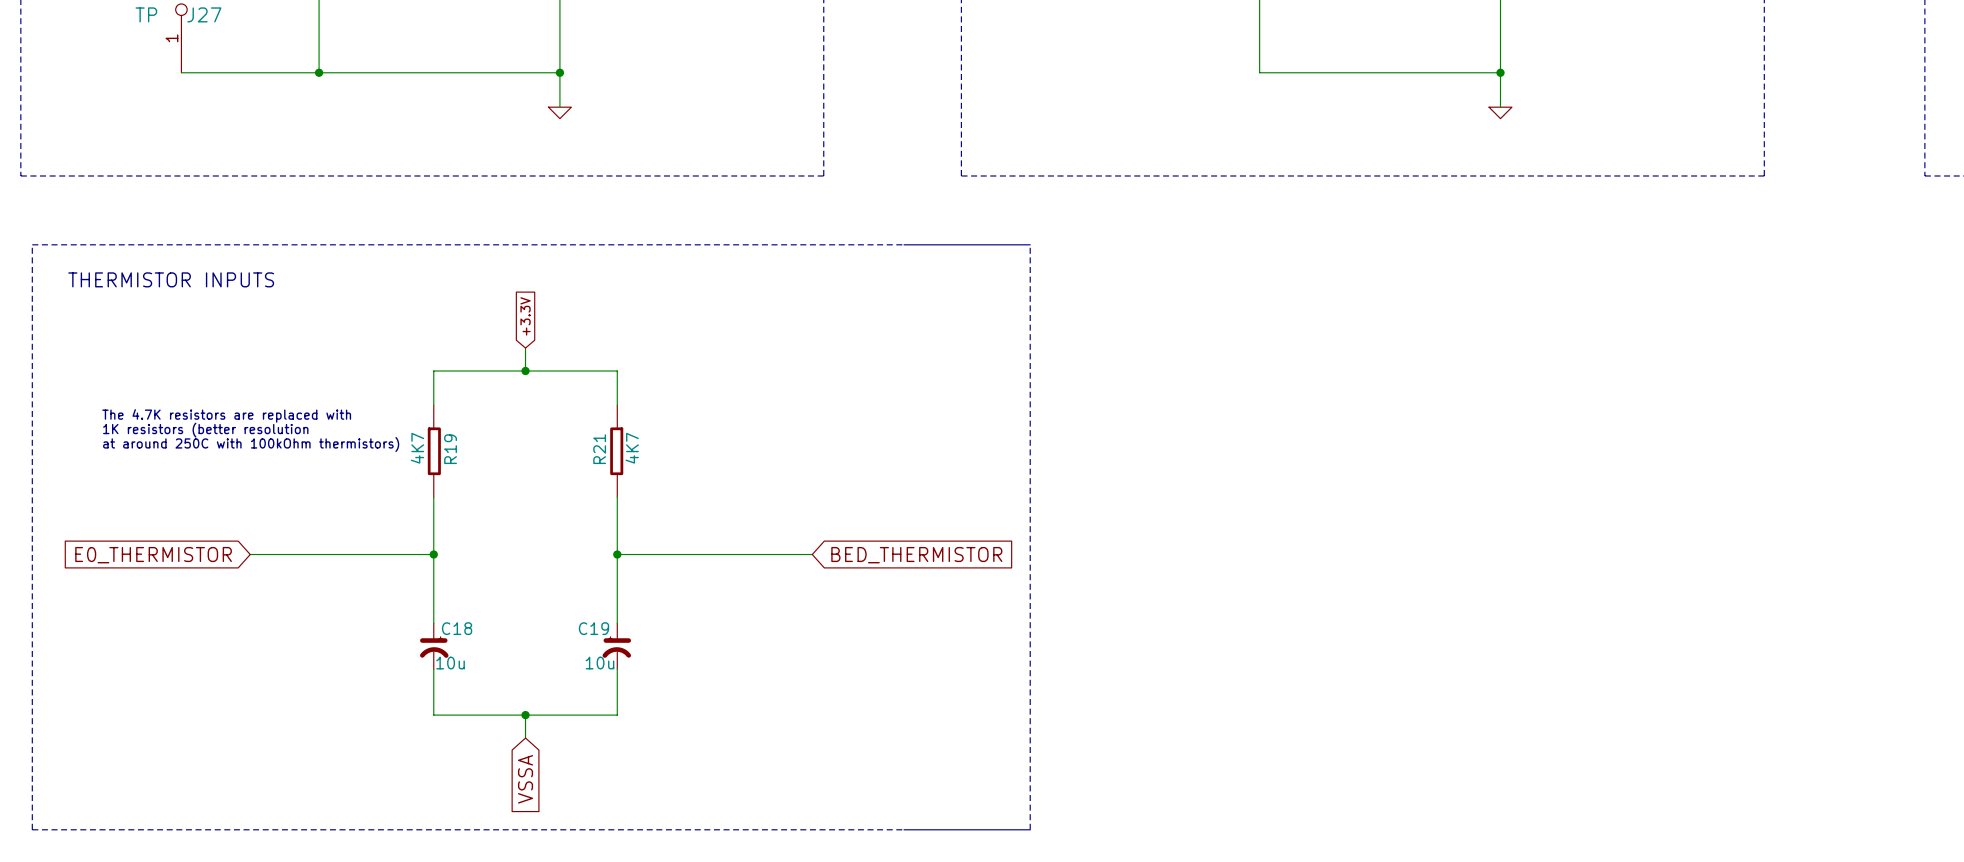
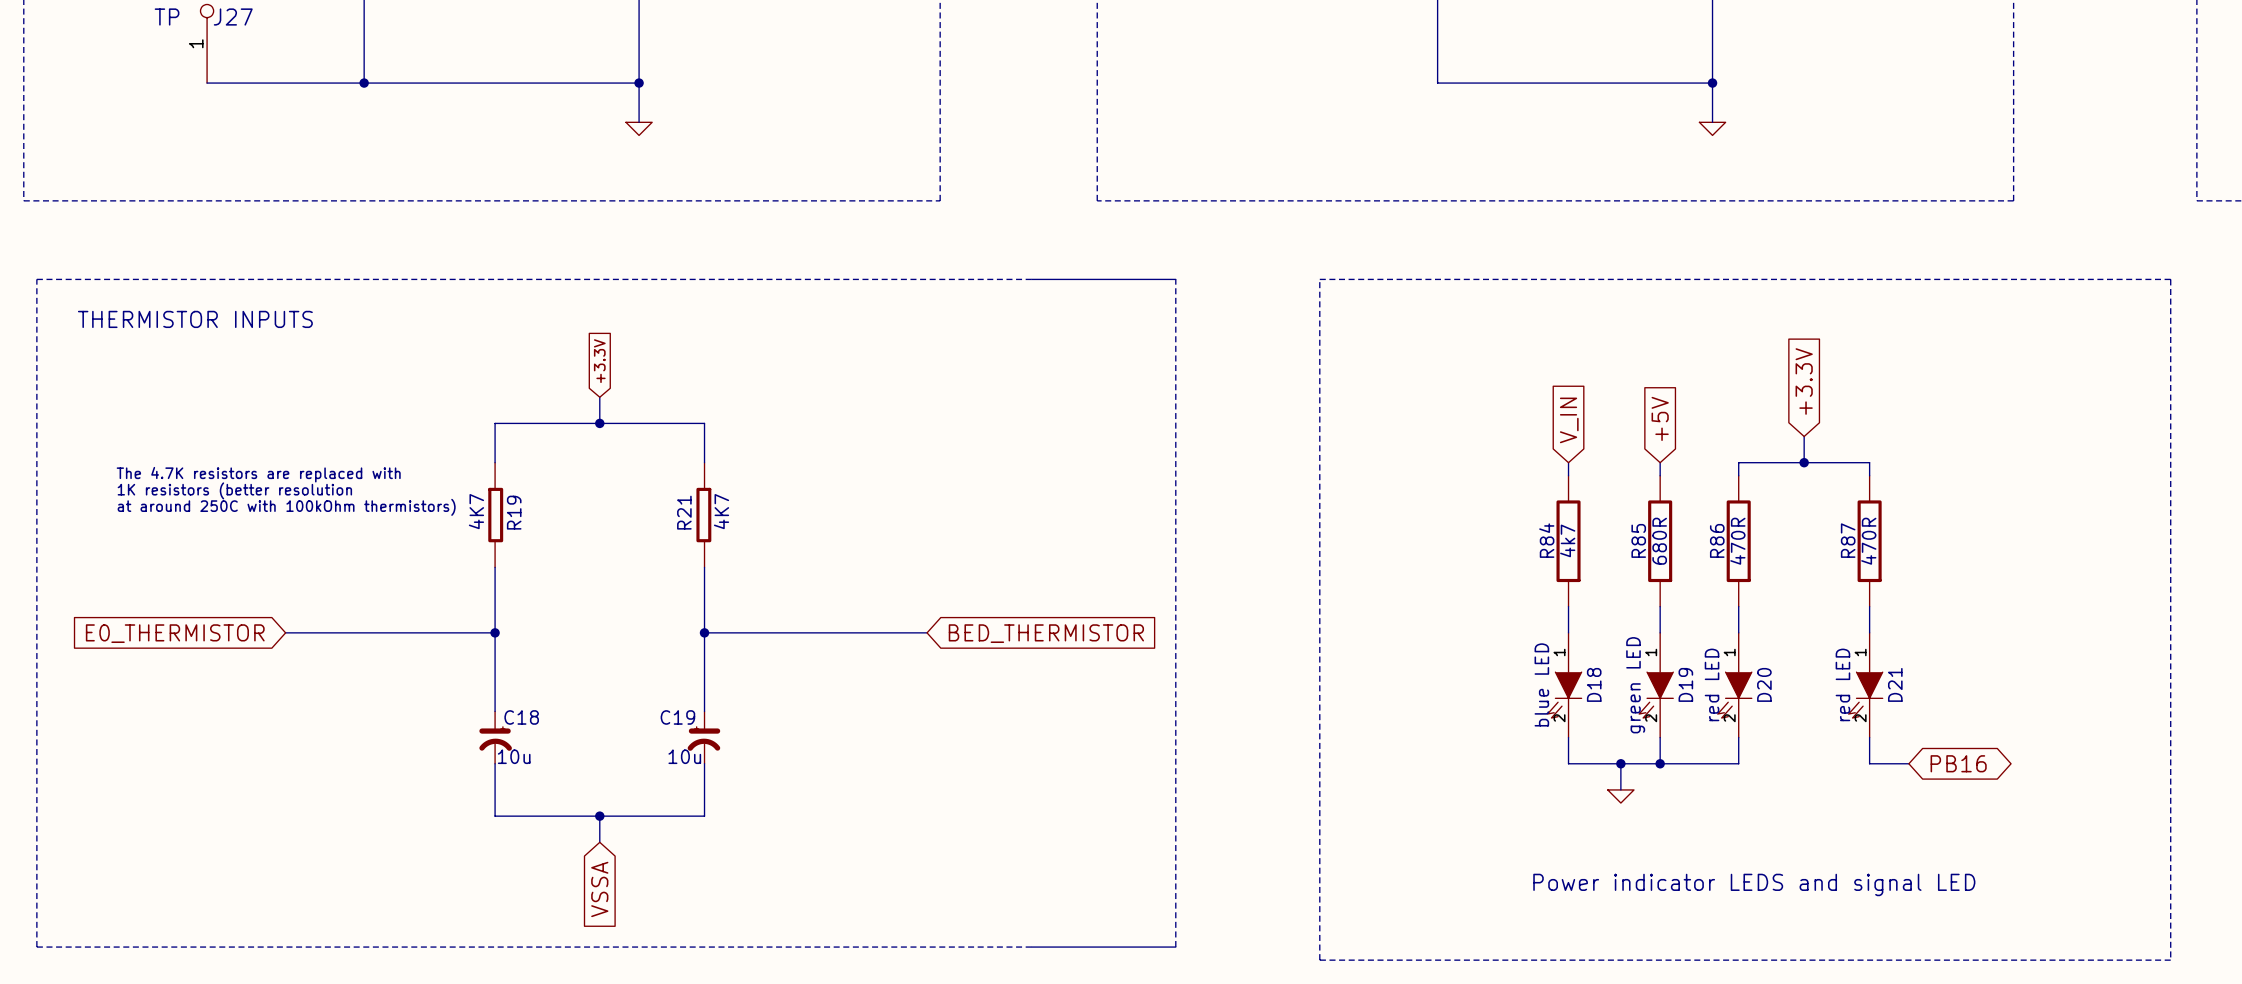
line: none -> (1319, 279) (2170, 279) (2170, 960) (1319, 960) (1319, 279)
global label: none -> +3.3V (1804, 381)
global label: none -> +5V (1660, 418)
global label: none -> V_IN (1569, 420)
wire: none -> (1804, 436) (1804, 462)
wire: none -> (1568, 462) (1568, 475)
wire: none -> (1660, 462) (1660, 475)
junction: none -> (1804, 462)
wire: none -> (1738, 475) (1738, 462) (1869, 462) (1869, 475)
R84: none -> 4k7 (1568, 541)
R85: none -> 680R (1660, 541)
R86: none -> 470R (1738, 541)
R87: none -> 470R (1869, 541)
wire: none -> (1568, 606) (1568, 632)
wire: none -> (1660, 606) (1660, 632)
wire: none -> (1738, 606) (1738, 632)
wire: none -> (1869, 606) (1869, 632)
D18: none -> blue LED (1564, 685)
D19: none -> green LED (1656, 685)
D20: none -> red LED (1734, 685)
D21: none -> red LED (1865, 685)
wire: none -> (1568, 737) (1568, 763) (1738, 763) (1738, 737)
wire: none -> (1660, 737) (1660, 763)
wire: none -> (1869, 737) (1869, 763) (1908, 763)
wire: none -> (1620, 763) (1620, 789)
junction: none -> (1620, 763)
junction: none -> (1660, 763)
global label: none -> PB16 (1958, 763)
power symbol: none -> (1620, 796)
text: none -> Power indicator LEDS and signal LED (1754, 884)

